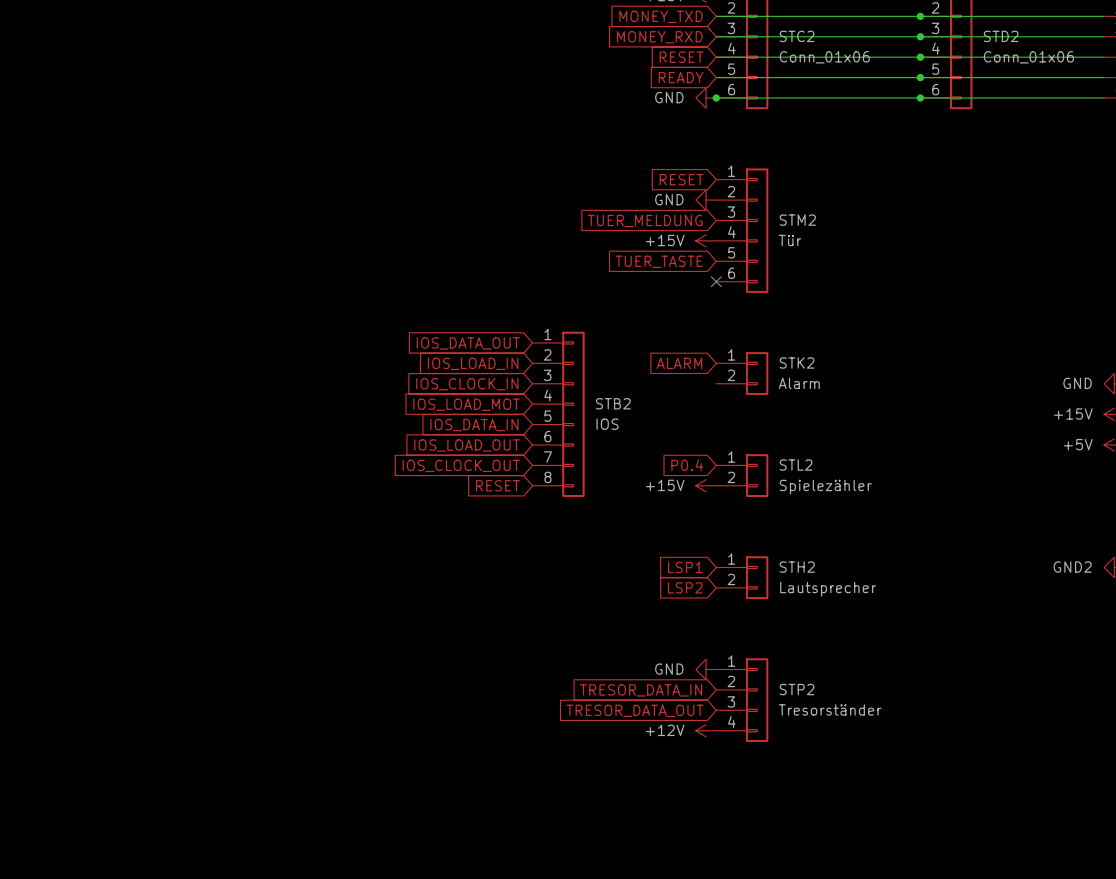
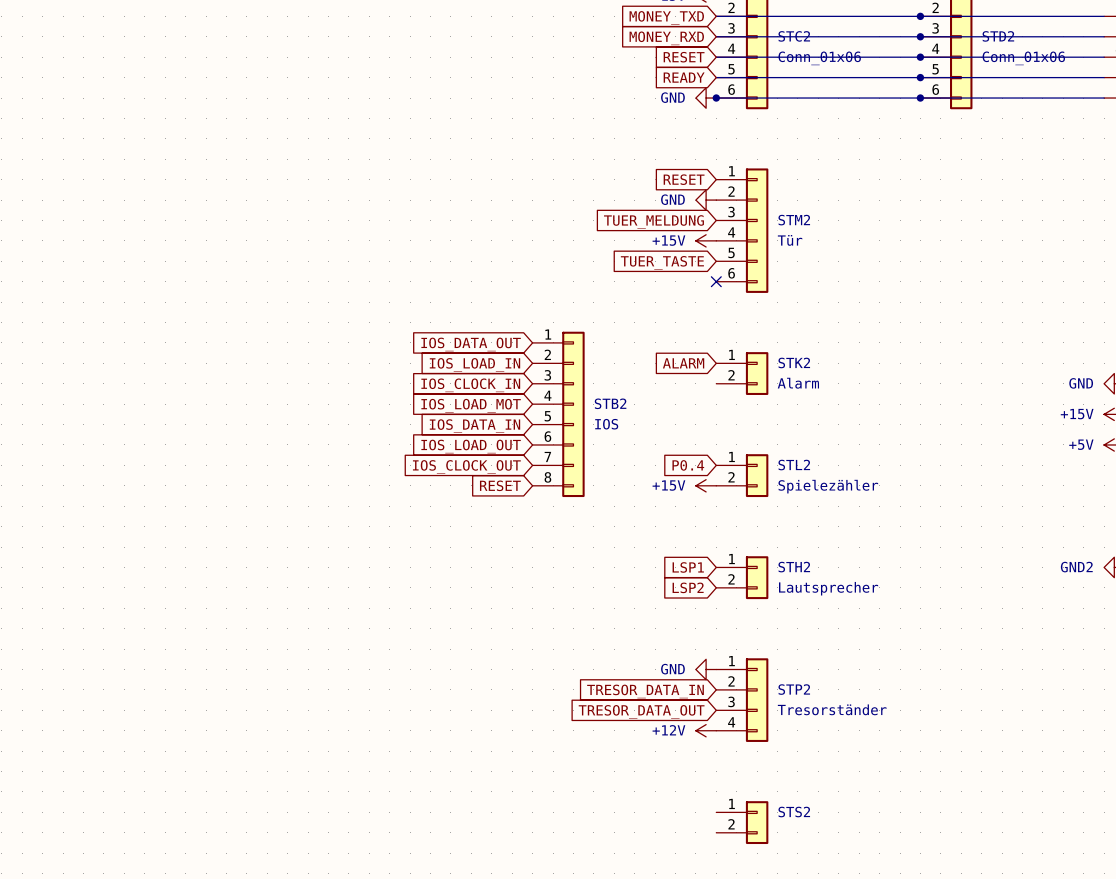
STS2: none -> (742, 822)

